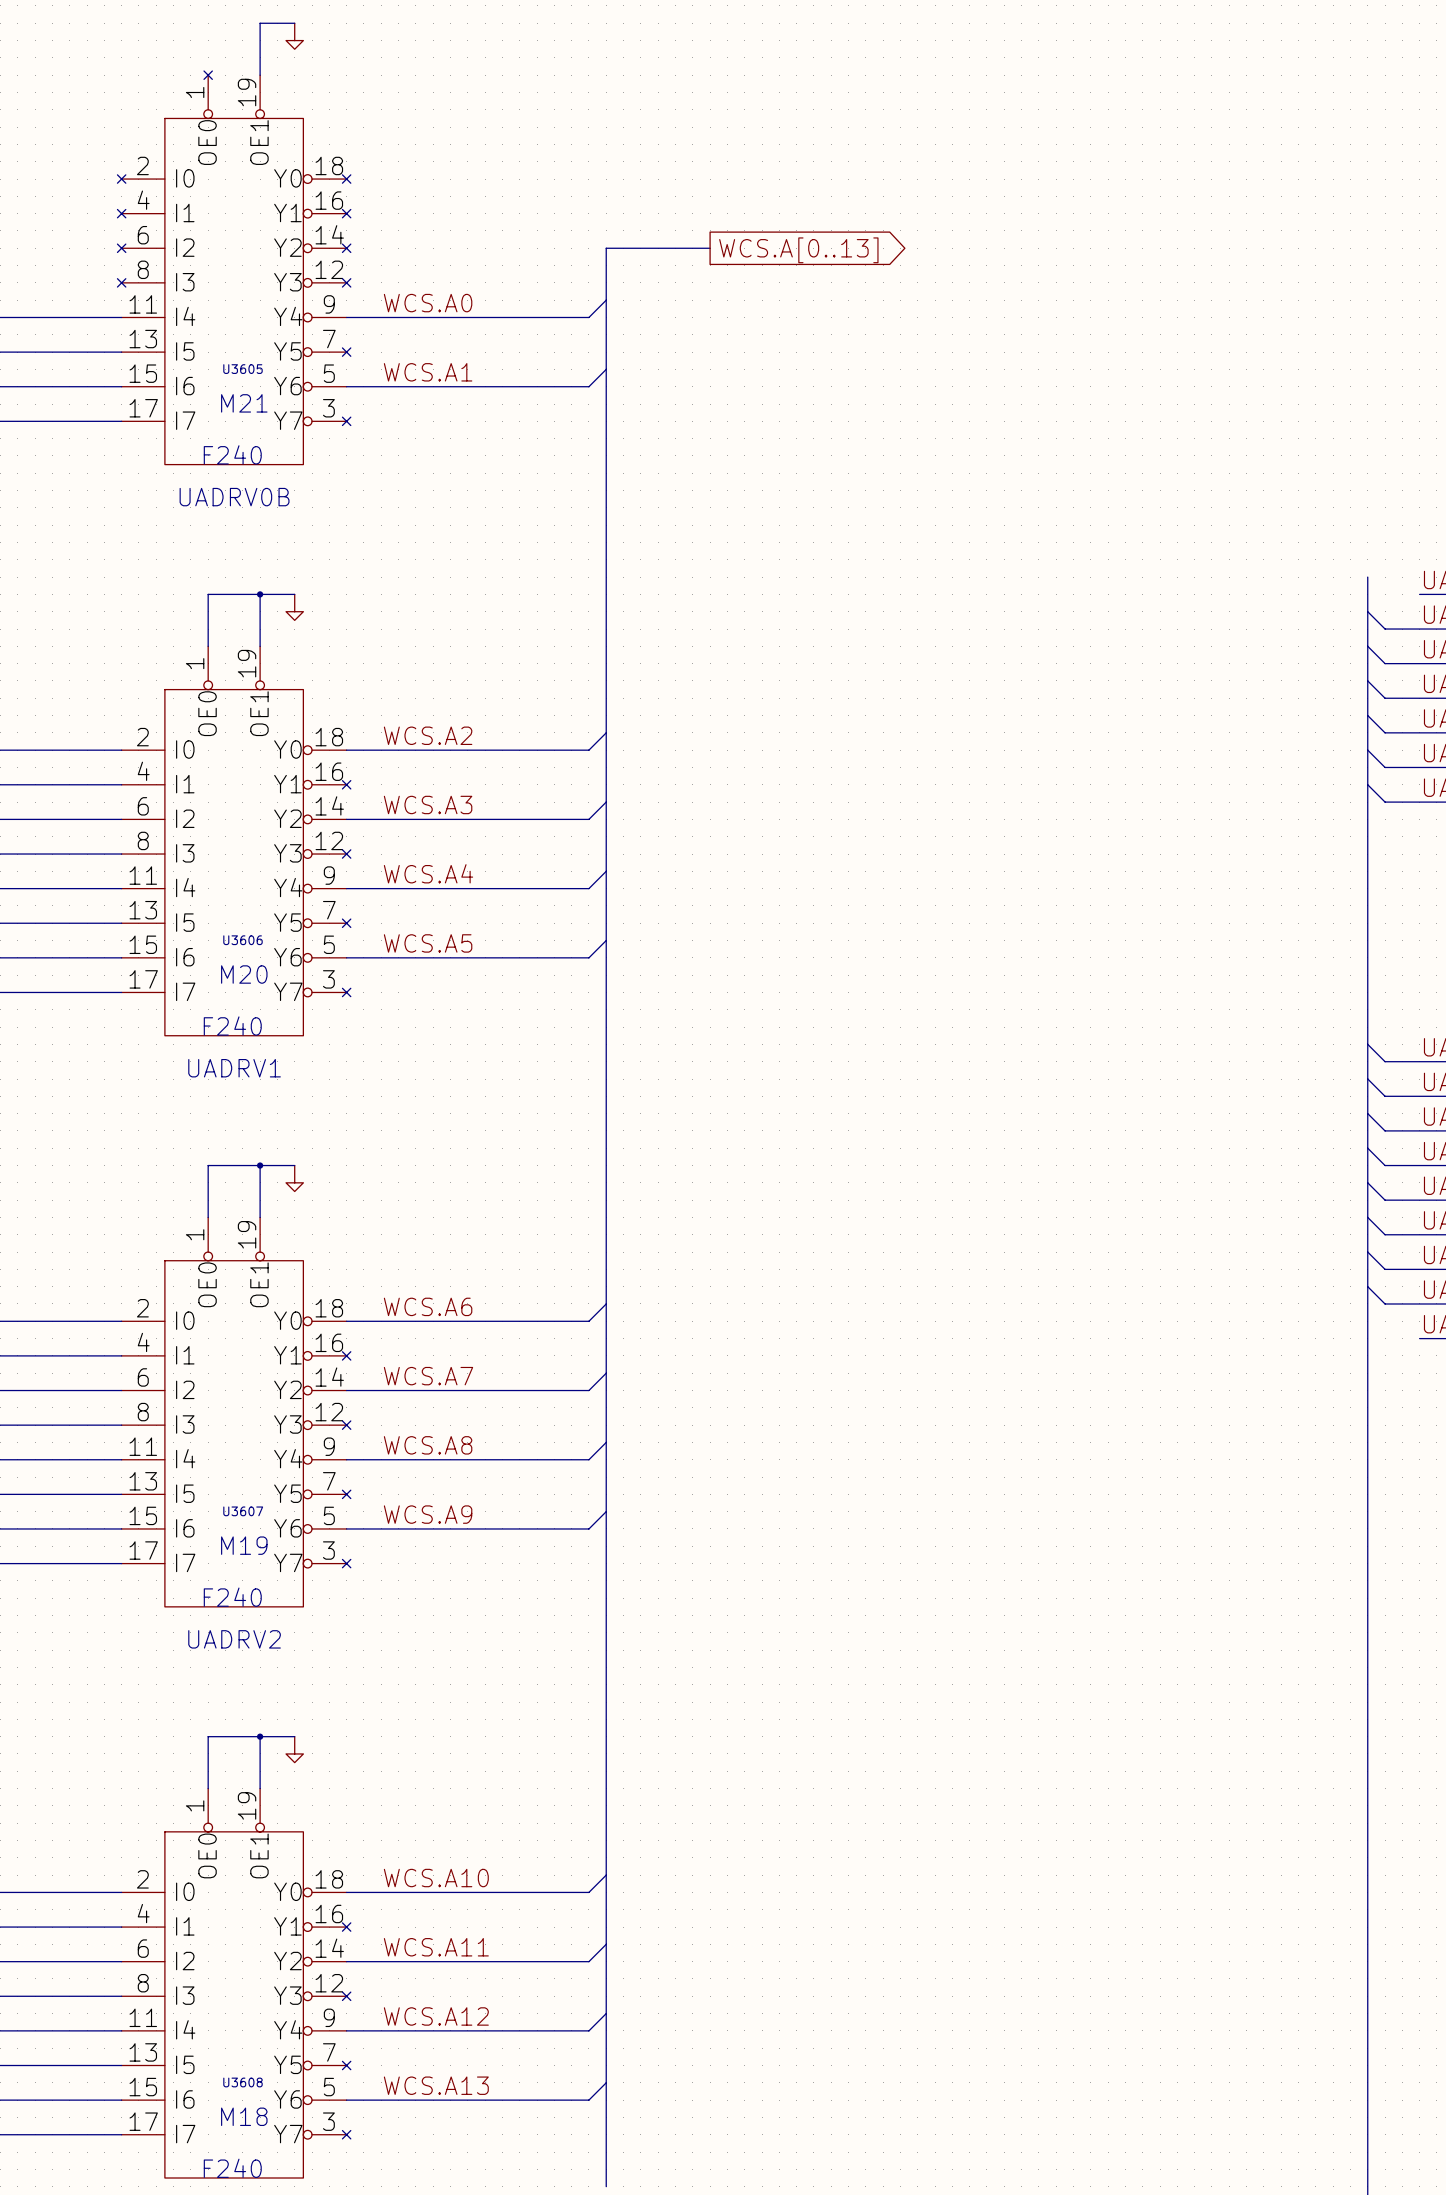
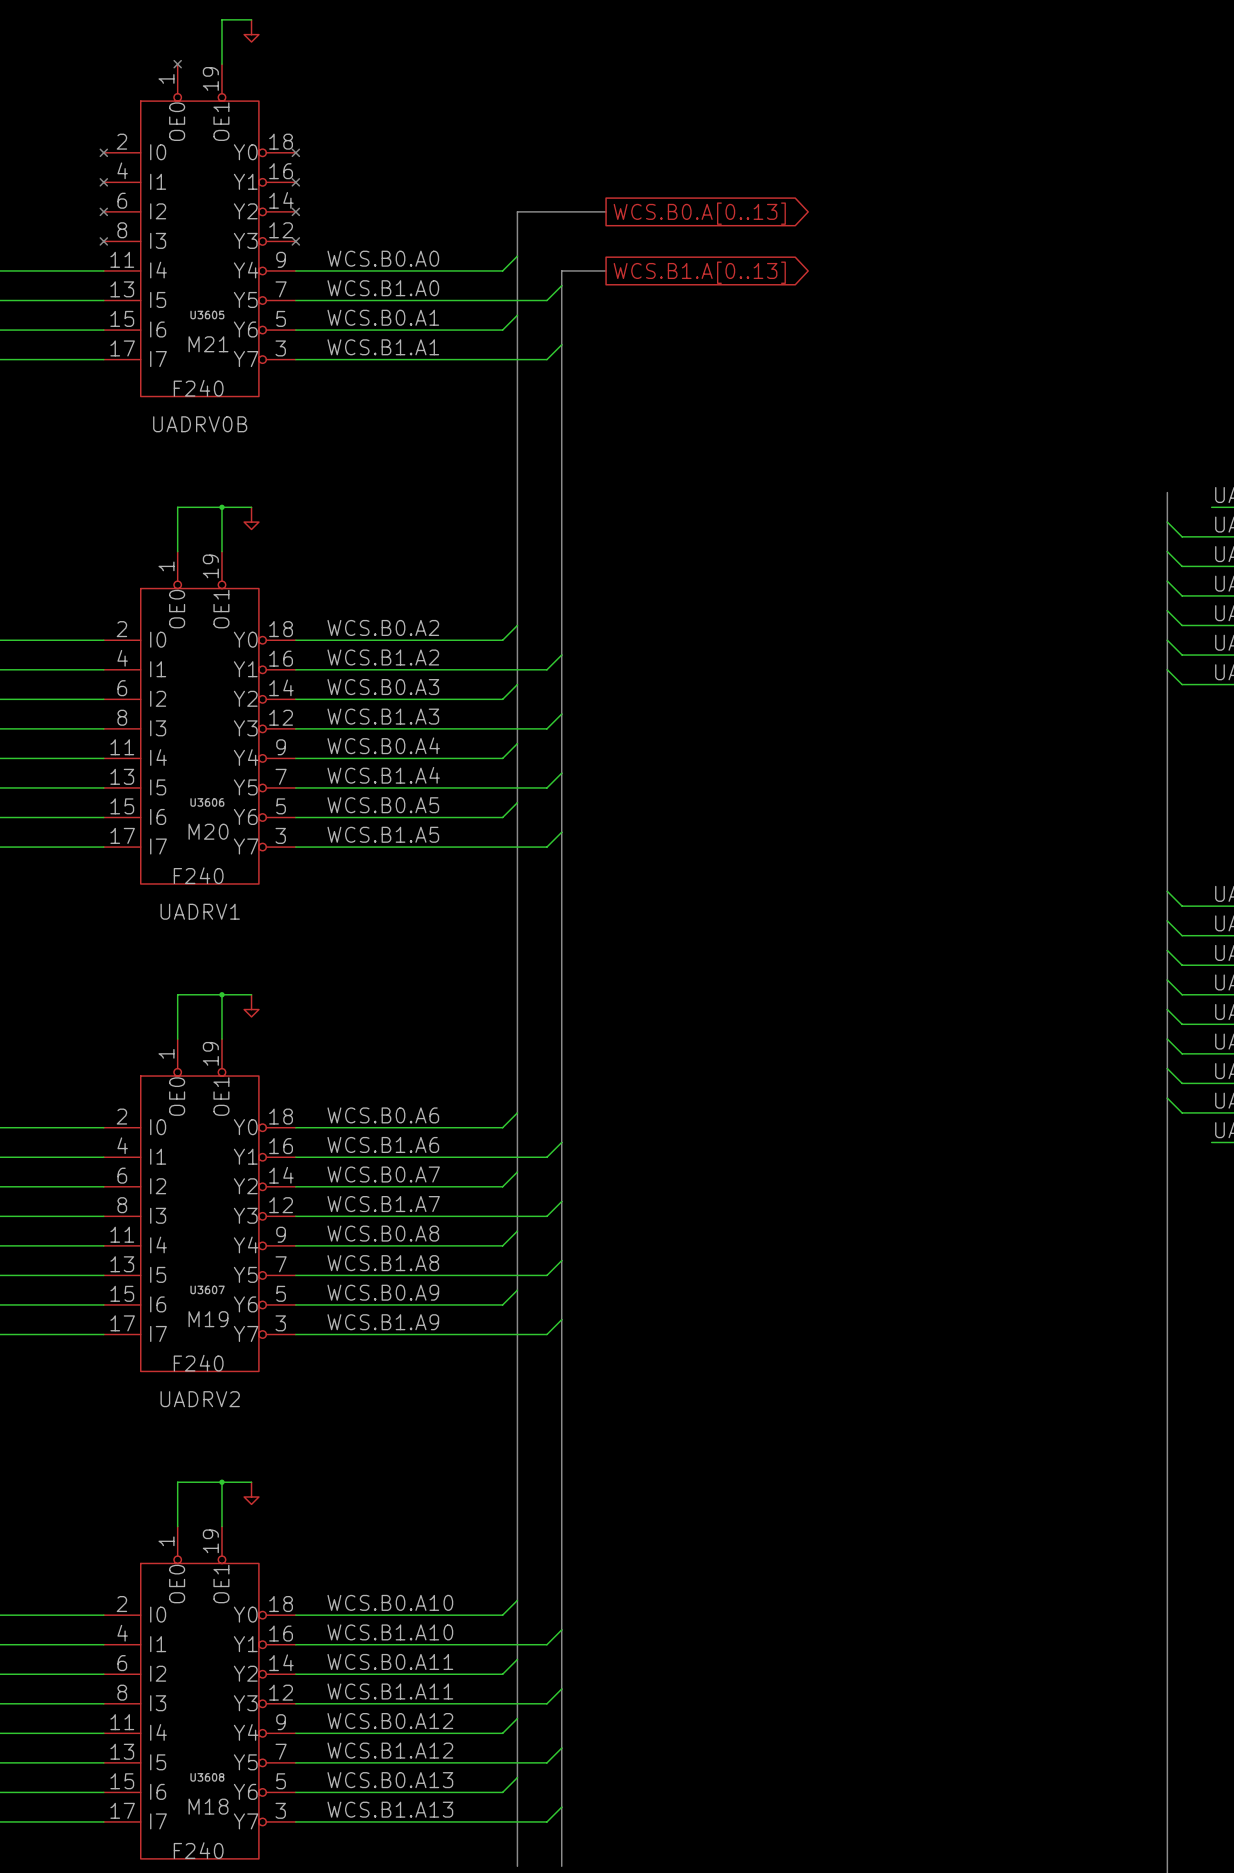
global label: WCS.A[0..13] (798, 250) -> WCS.B0.A[0..13] (699, 213)
label: WCS.A0 (428, 303) -> WCS.B0.A0 (383, 258)
bus: none -> (606, 270) (561, 270) (561, 1866)
global label: none -> WCS.B1.A[0..13] (699, 272)
wire: none -> (561, 285) (546, 300) (295, 300)
label: none -> WCS.B1.A0 (383, 288)
no-connect mark: (346, 352) -> none
label: WCS.A1 (428, 372) -> WCS.B0.A1 (383, 317)
wire: none -> (561, 344) (546, 359) (295, 359)
label: none -> WCS.B1.A1 (383, 347)
no-connect mark: (346, 421) -> none
label: WCS.A2 (428, 735) -> WCS.B0.A2 (383, 627)
wire: none -> (561, 655) (546, 669) (295, 669)
label: none -> WCS.B1.A2 (383, 657)
no-connect mark: (346, 784) -> none
label: WCS.A3 (428, 804) -> WCS.B0.A3 (383, 687)
wire: none -> (561, 714) (546, 728) (295, 728)
label: none -> WCS.B1.A3 (383, 716)
no-connect mark: (346, 854) -> none
label: WCS.A4 (428, 873) -> WCS.B0.A4 (383, 745)
wire: none -> (561, 773) (546, 787) (295, 787)
label: none -> WCS.B1.A4 (383, 775)
no-connect mark: (346, 923) -> none
label: WCS.A5 (428, 943) -> WCS.B0.A5 (383, 805)
wire: none -> (561, 832) (546, 847) (295, 847)
label: none -> WCS.B1.A5 (383, 834)
no-connect mark: (346, 992) -> none
label: WCS.A6 (428, 1306) -> WCS.B0.A6 (383, 1115)
wire: none -> (561, 1142) (546, 1157) (295, 1157)
label: none -> WCS.B1.A6 (383, 1144)
no-connect mark: (346, 1355) -> none
label: WCS.A7 (428, 1376) -> WCS.B0.A7 (383, 1174)
wire: none -> (561, 1201) (546, 1216) (295, 1216)
label: none -> WCS.B1.A7 (383, 1204)
no-connect mark: (346, 1425) -> none
label: WCS.A8 (428, 1445) -> WCS.B0.A8 (383, 1233)
wire: none -> (561, 1260) (546, 1275) (295, 1275)
label: none -> WCS.B1.A8 (383, 1263)
no-connect mark: (346, 1494) -> none
label: WCS.A9 (428, 1514) -> WCS.B0.A9 (383, 1292)
wire: none -> (561, 1319) (546, 1334) (295, 1334)
label: none -> WCS.B1.A9 (383, 1322)
no-connect mark: (346, 1563) -> none
label: WCS.A10 (436, 1878) -> WCS.B0.A10 (390, 1602)
wire: none -> (561, 1629) (546, 1644) (295, 1644)
label: none -> WCS.B1.A10 (390, 1632)
no-connect mark: (346, 1927) -> none
label: WCS.A11 (436, 1947) -> WCS.B0.A11 (390, 1661)
wire: none -> (561, 1689) (546, 1703) (295, 1703)
label: none -> WCS.B1.A11 (390, 1691)
no-connect mark: (346, 1996) -> none
label: WCS.A12 (436, 2016) -> WCS.B0.A12 (390, 1721)
wire: none -> (561, 1748) (546, 1762) (295, 1762)
label: none -> WCS.B1.A12 (390, 1750)
no-connect mark: (346, 2065) -> none
label: WCS.A13 (436, 2085) -> WCS.B0.A13 (390, 1780)
wire: none -> (561, 1807) (546, 1821) (295, 1821)
label: none -> WCS.B1.A13 (390, 1809)
no-connect mark: (346, 2134) -> none

